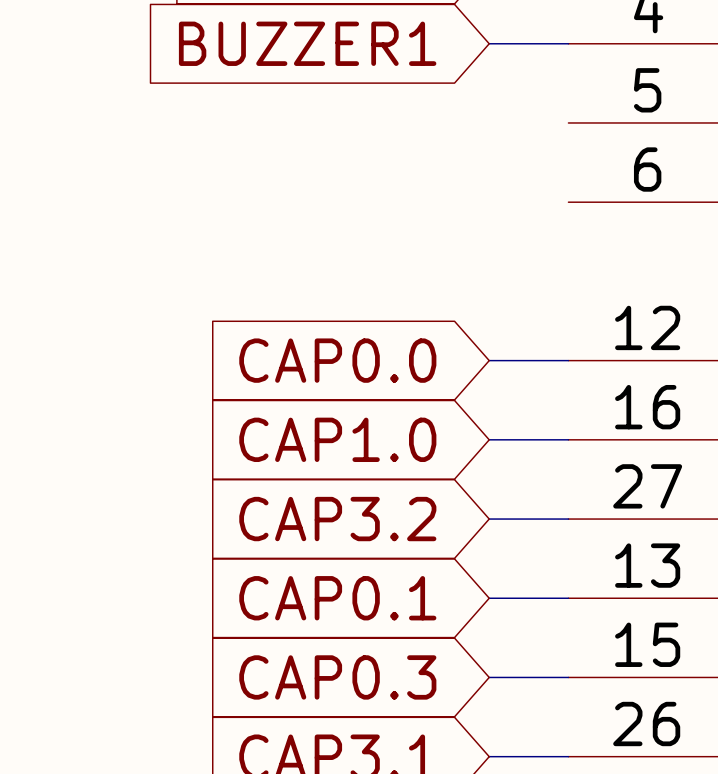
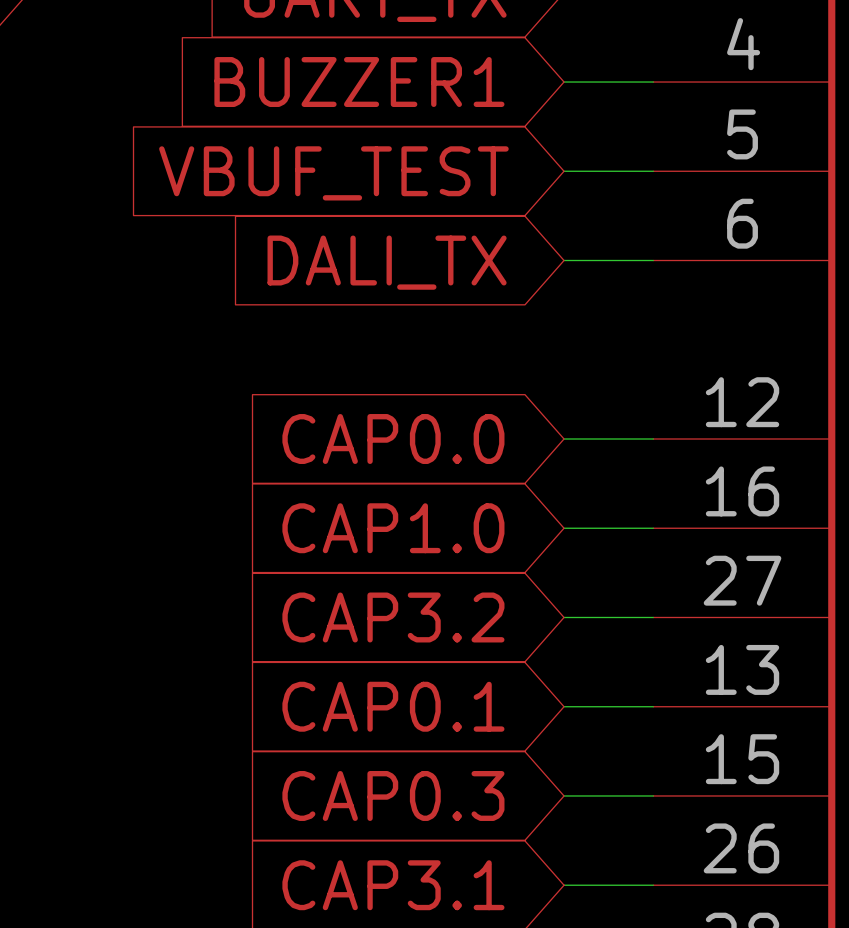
wire: none -> (564, 171) (653, 171)
global label: none -> VBUF_TEST (333, 173)
wire: none -> (564, 260) (653, 260)
global label: none -> DALI_TX (387, 262)

